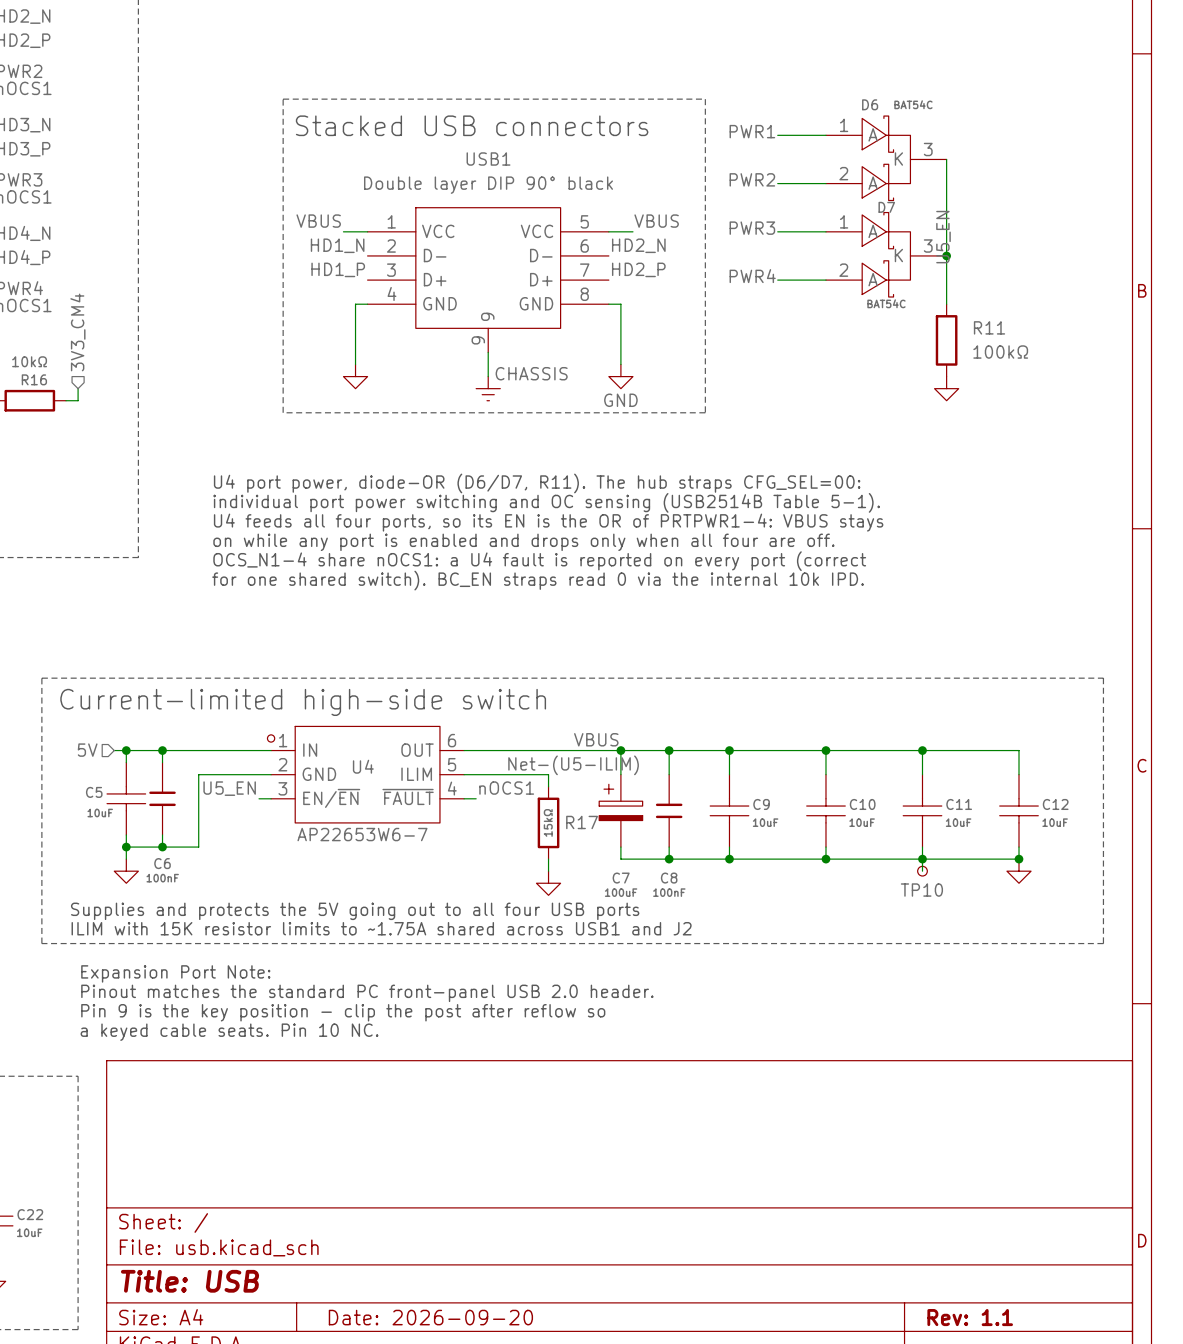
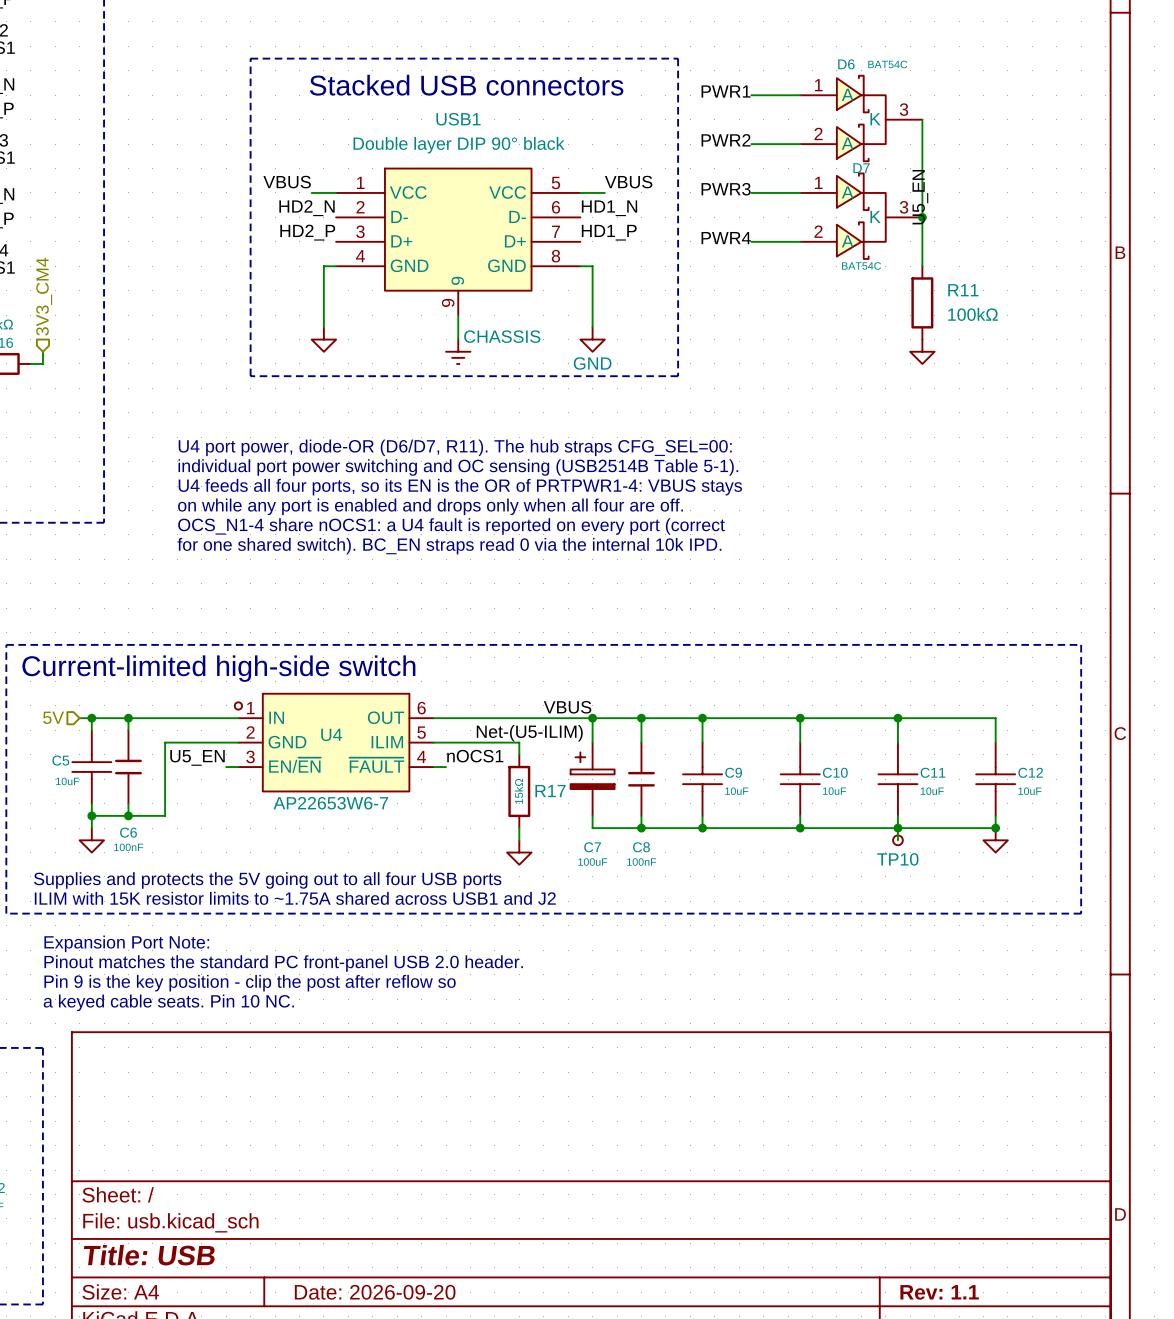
label: HD1_N (337, 245) -> HD2_N (307, 208)
label: HD2_N (638, 245) -> HD1_N (609, 208)
label: HD1_P (338, 269) -> HD2_P (307, 232)
label: HD2_P (638, 269) -> HD1_P (609, 232)

